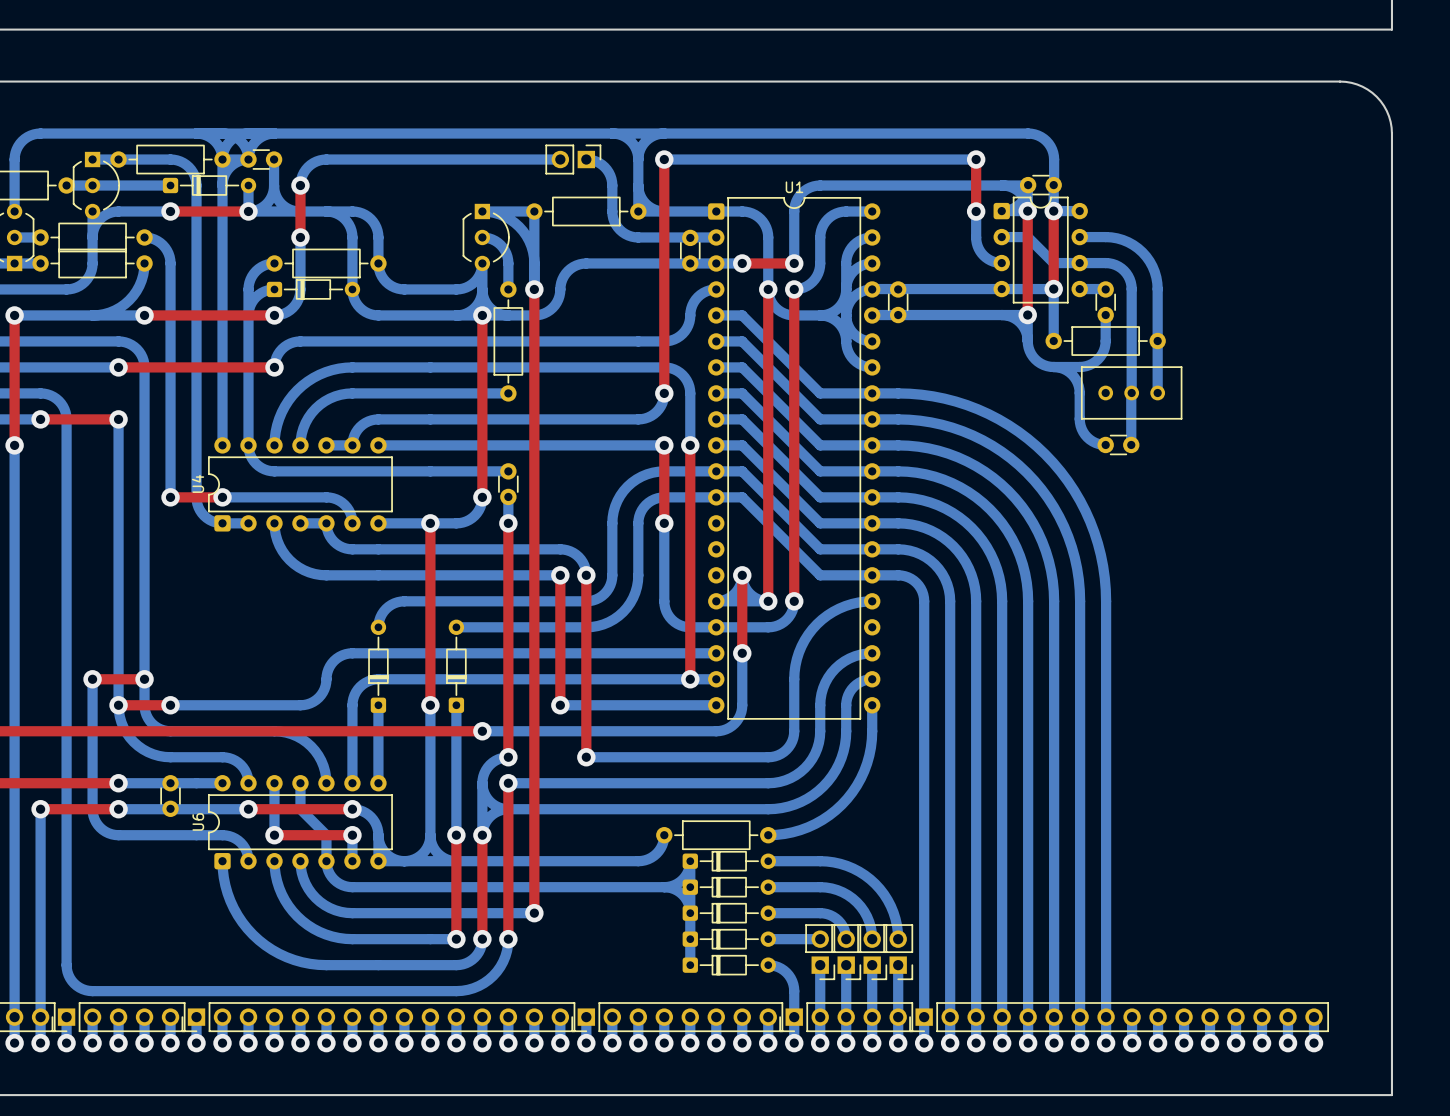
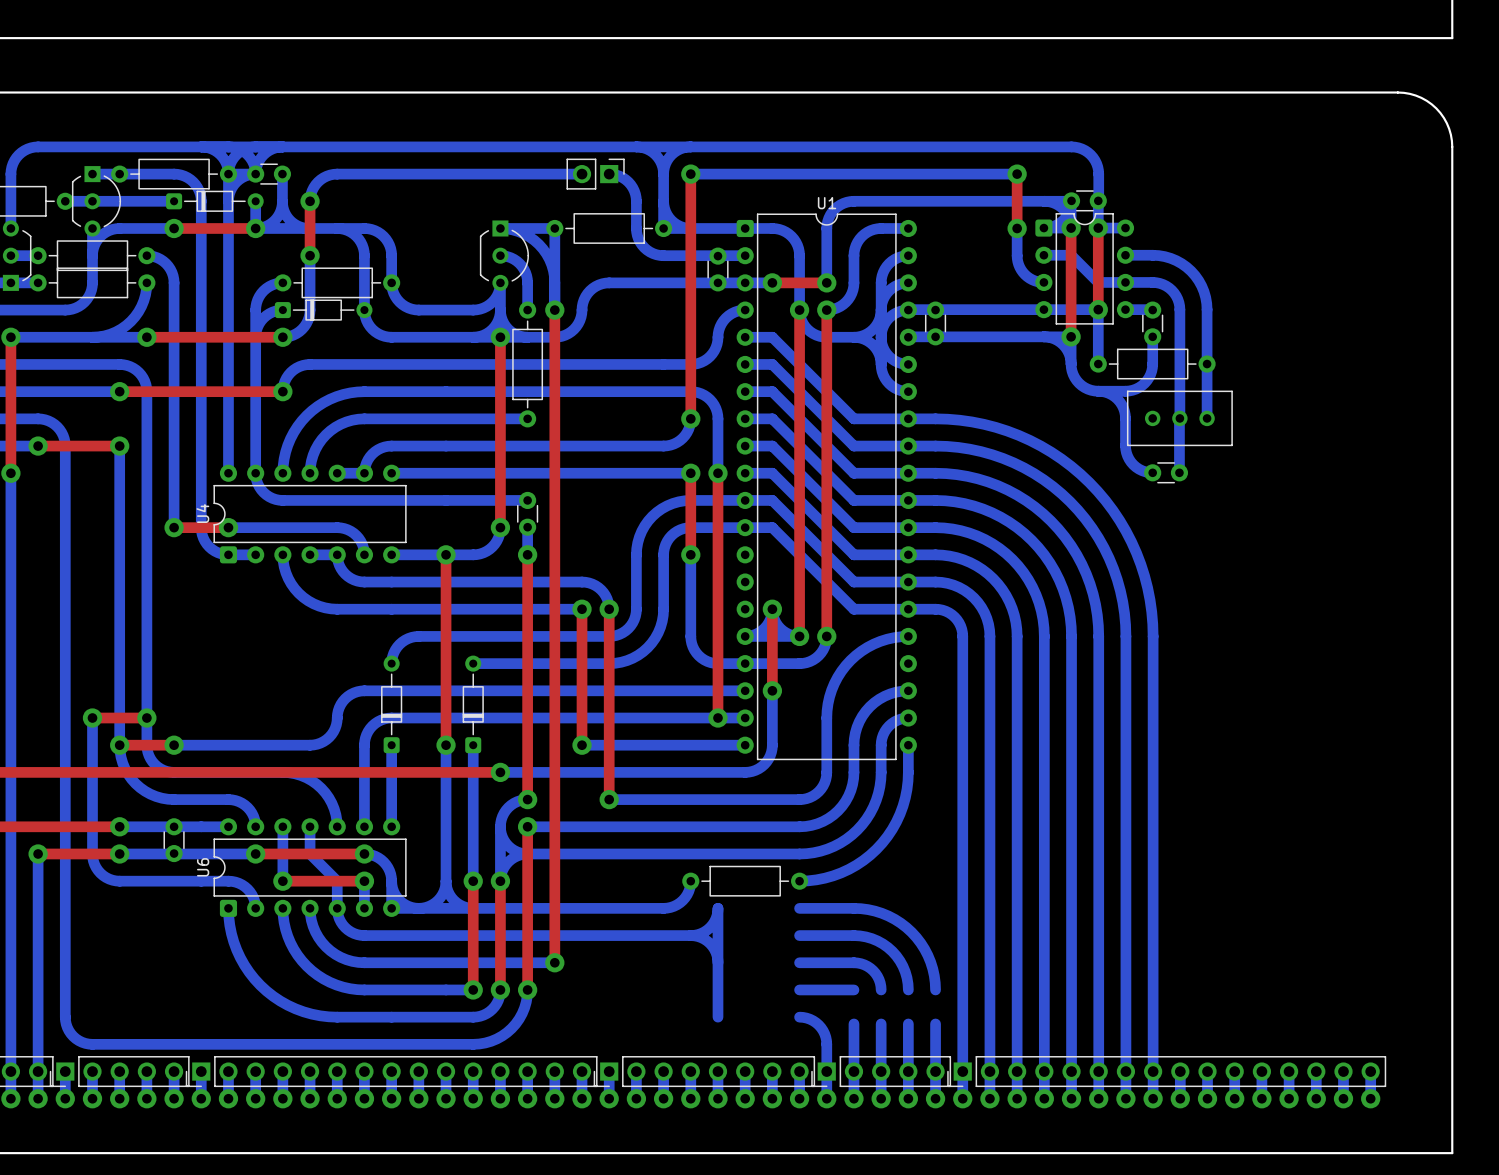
part: (729, 861) -> none
part: (729, 887) -> none
part: (729, 913) -> none
part: (729, 939) -> none
part: (820, 952) -> none
part: (846, 952) -> none
part: (872, 952) -> none
part: (898, 952) -> none
part: (729, 965) -> none

